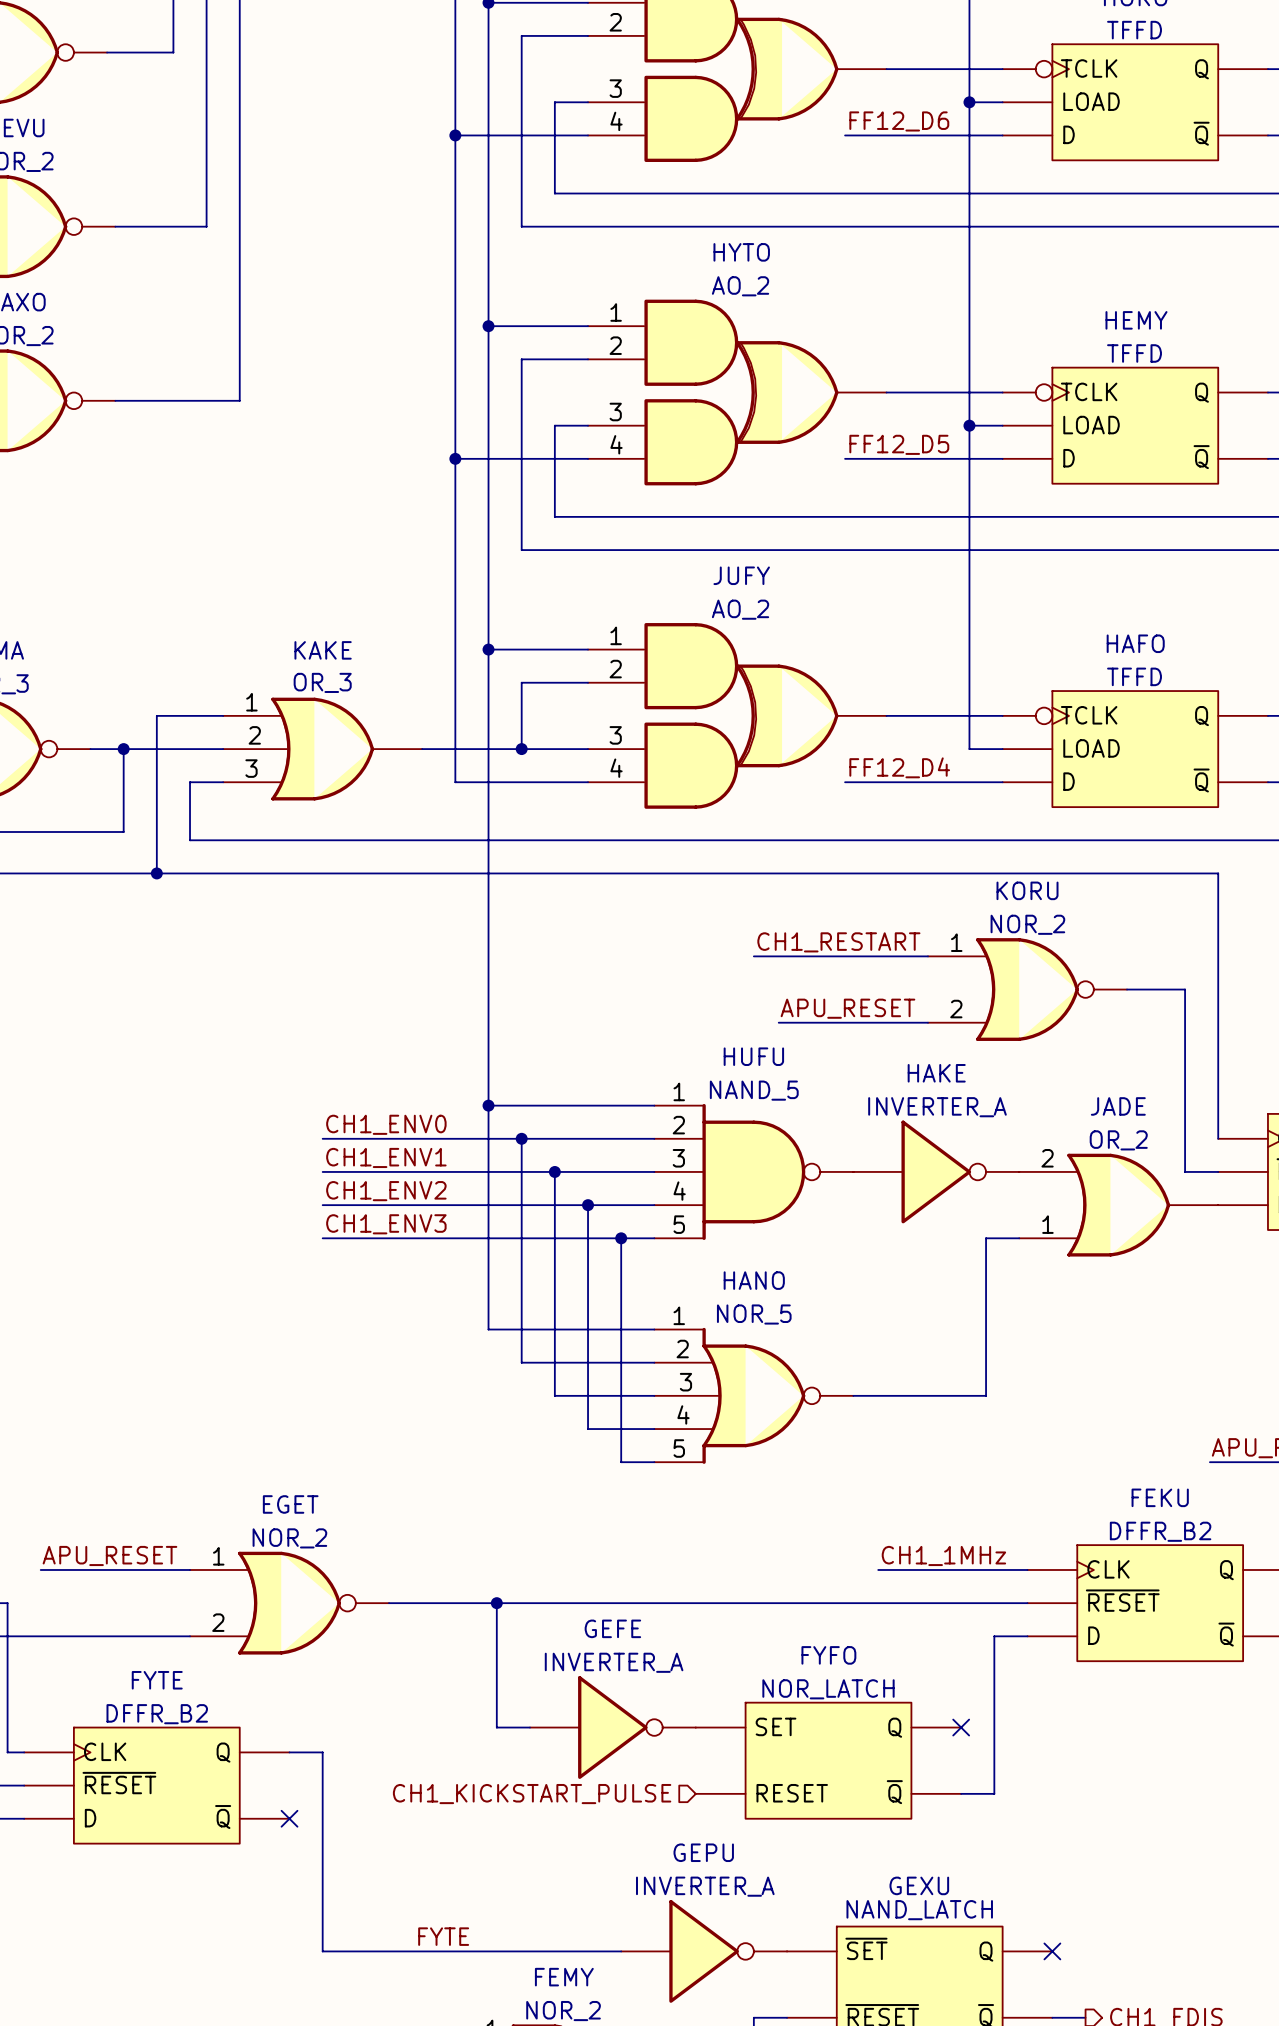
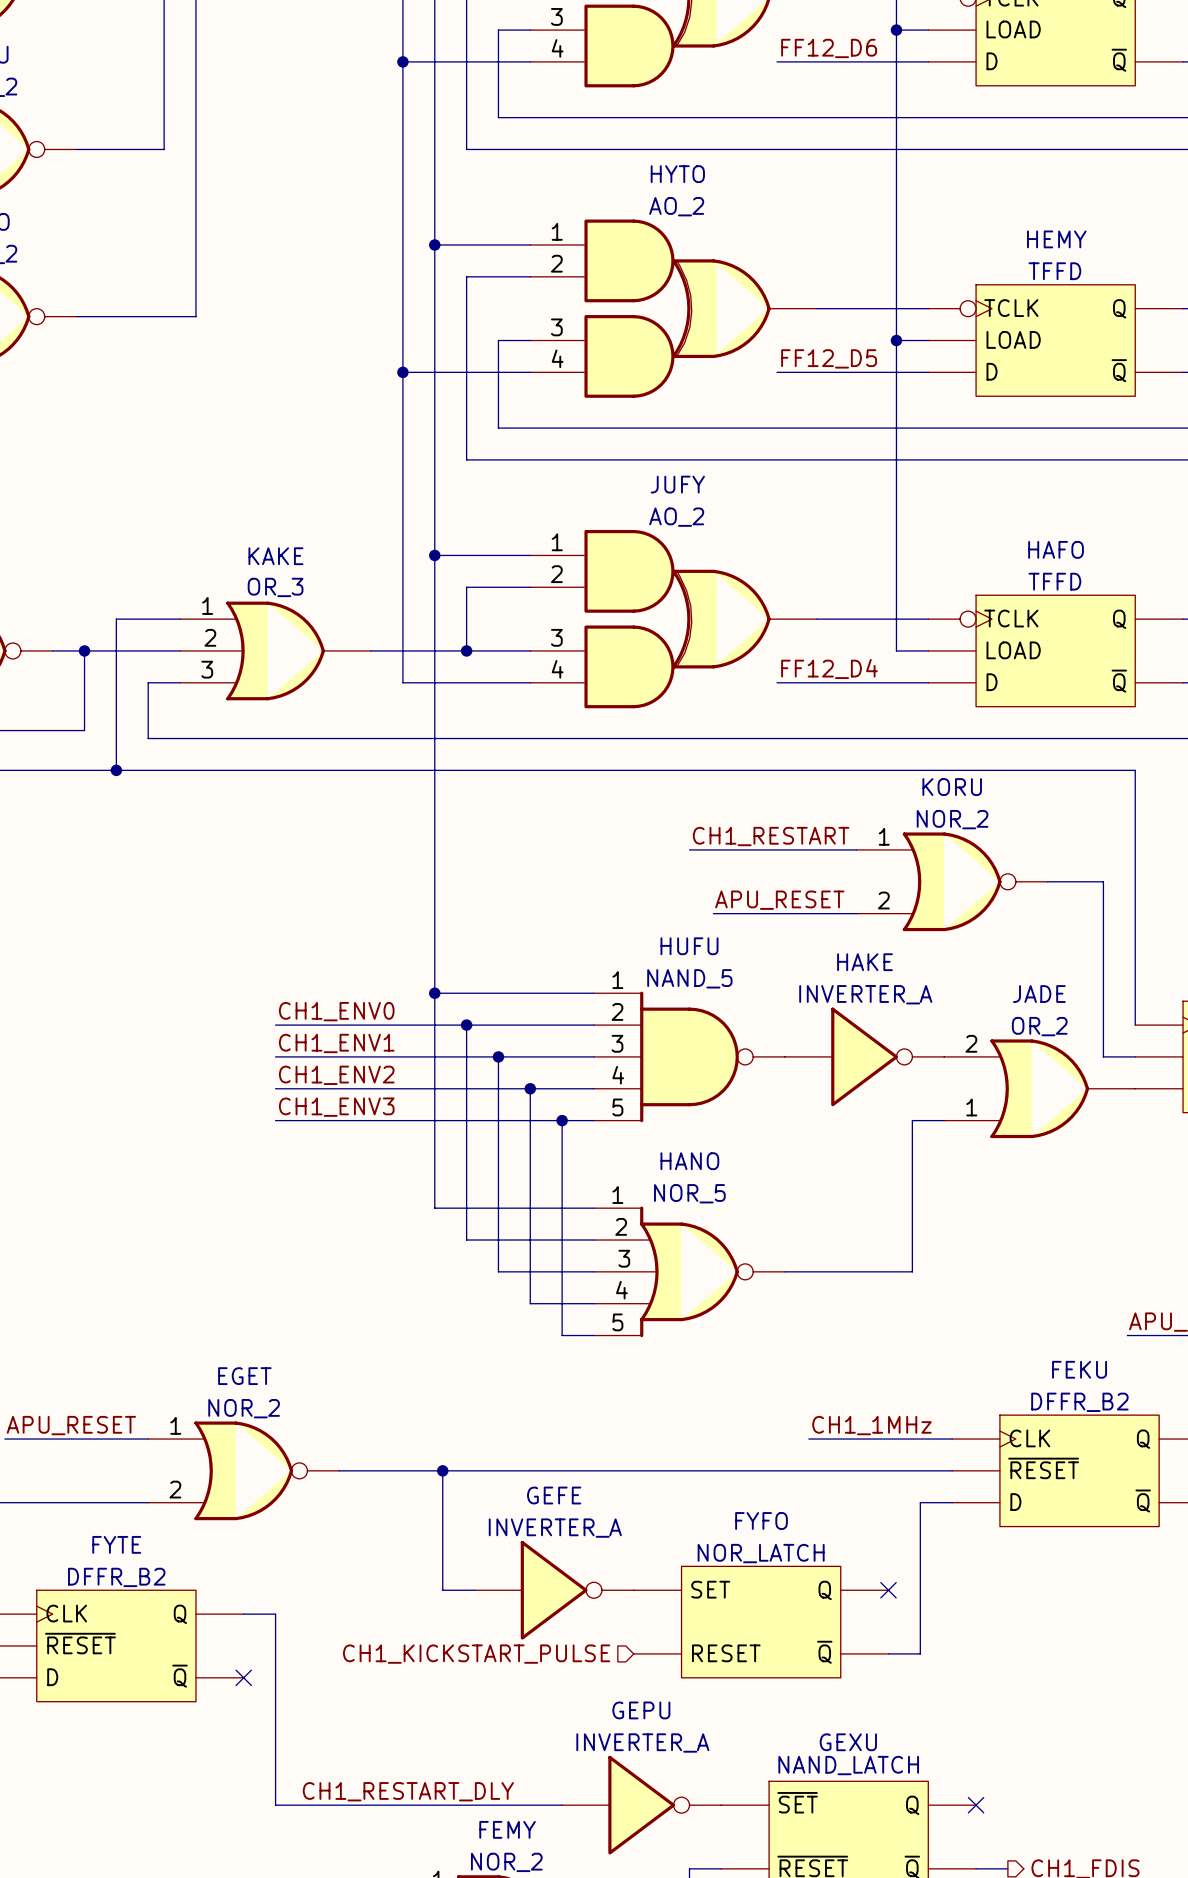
label: FYTE (443, 1936) -> none
label: none -> CH1_RESTART_DLY (408, 1791)

